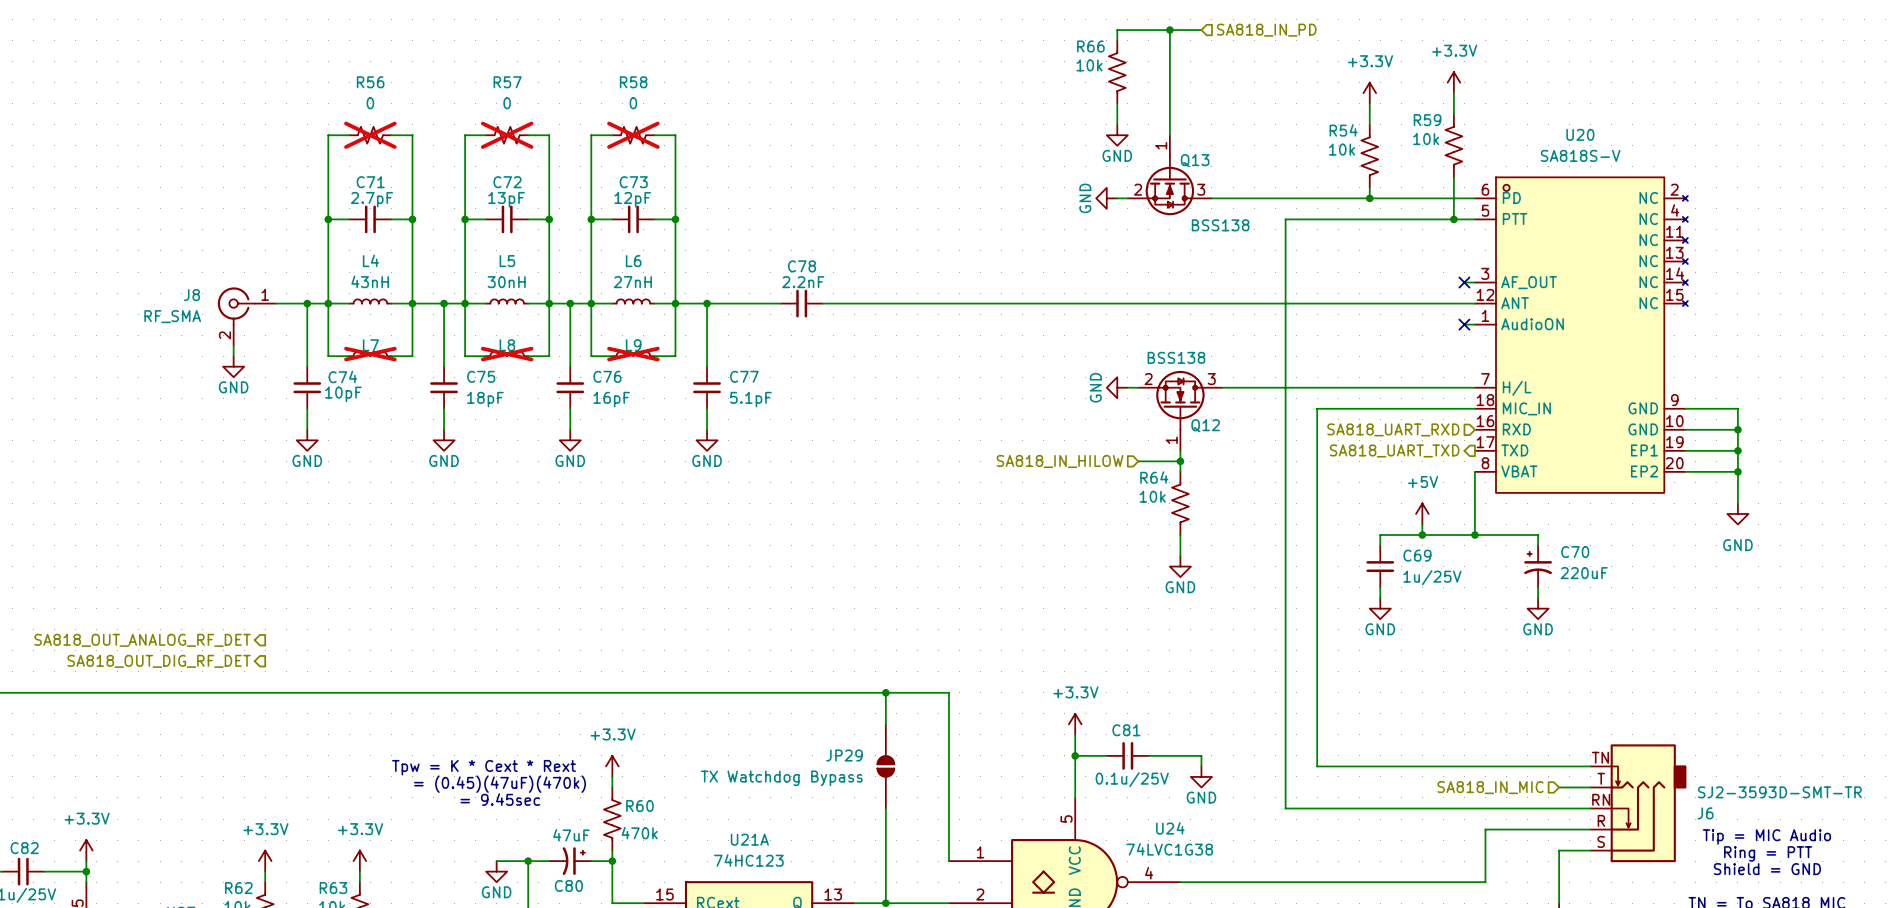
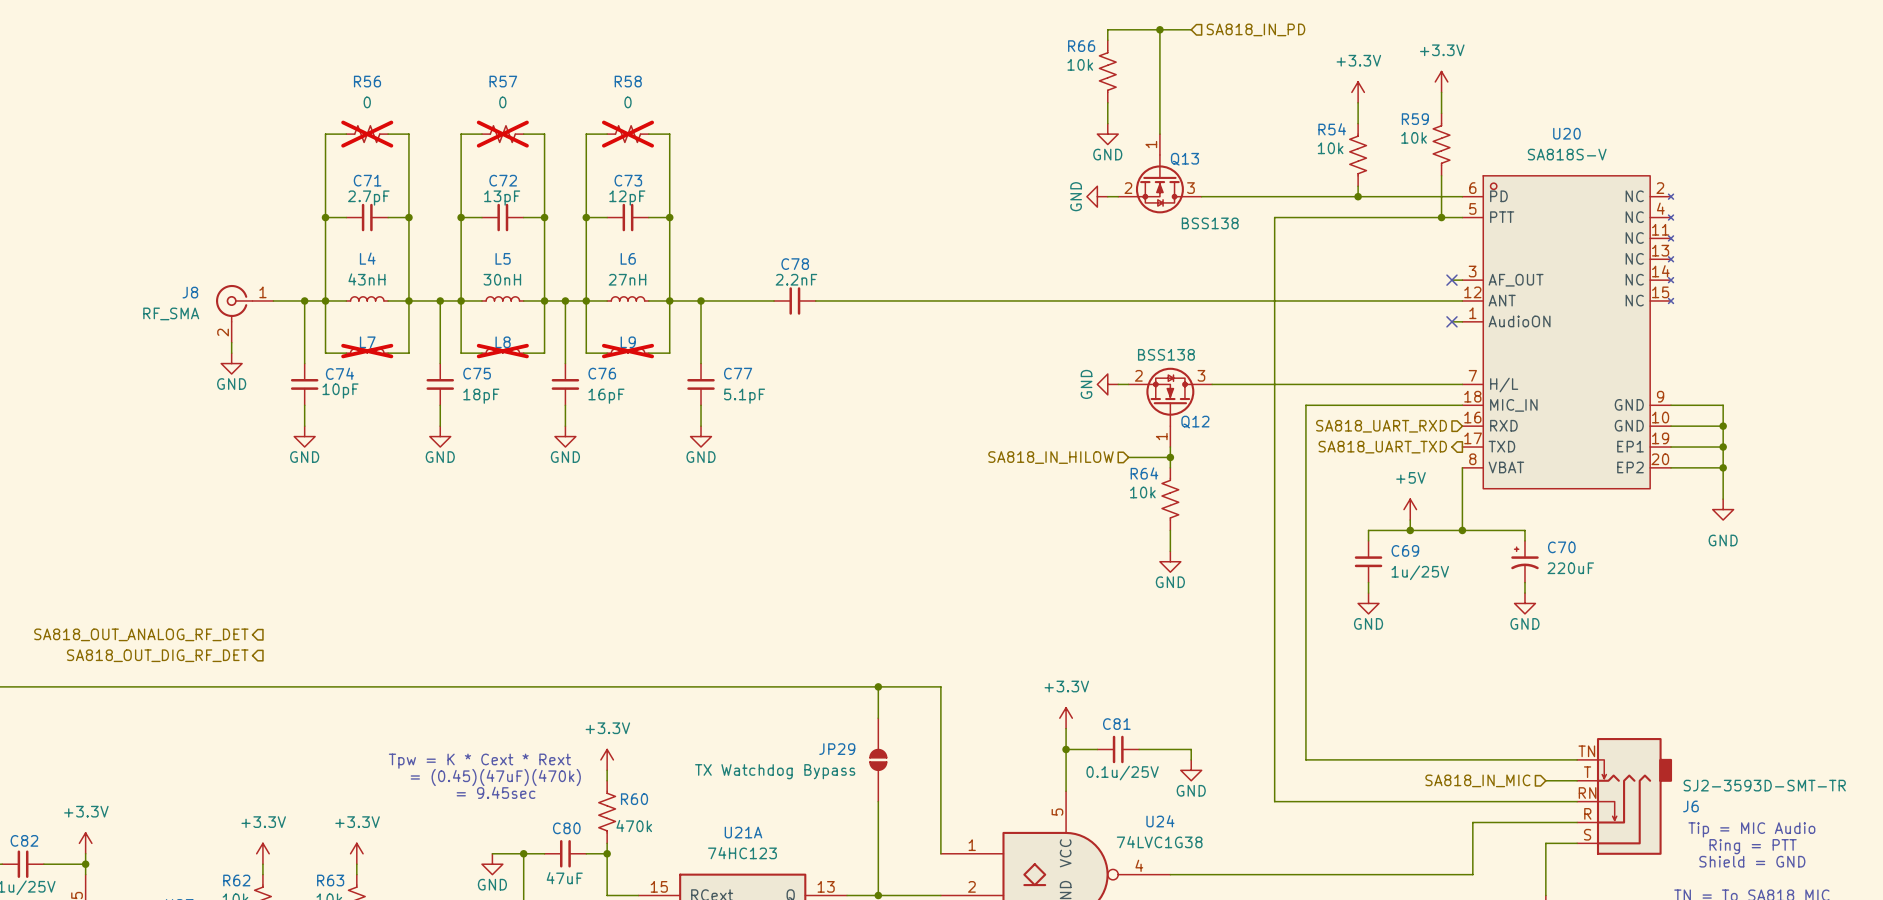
C80 value position: 47uF (571, 835) -> 47uF (564, 878)
C80 symbol: [549, 847, 592, 876] -> [544, 840, 587, 868]
C80 name position: C80 (568, 885) -> C80 (566, 828)

